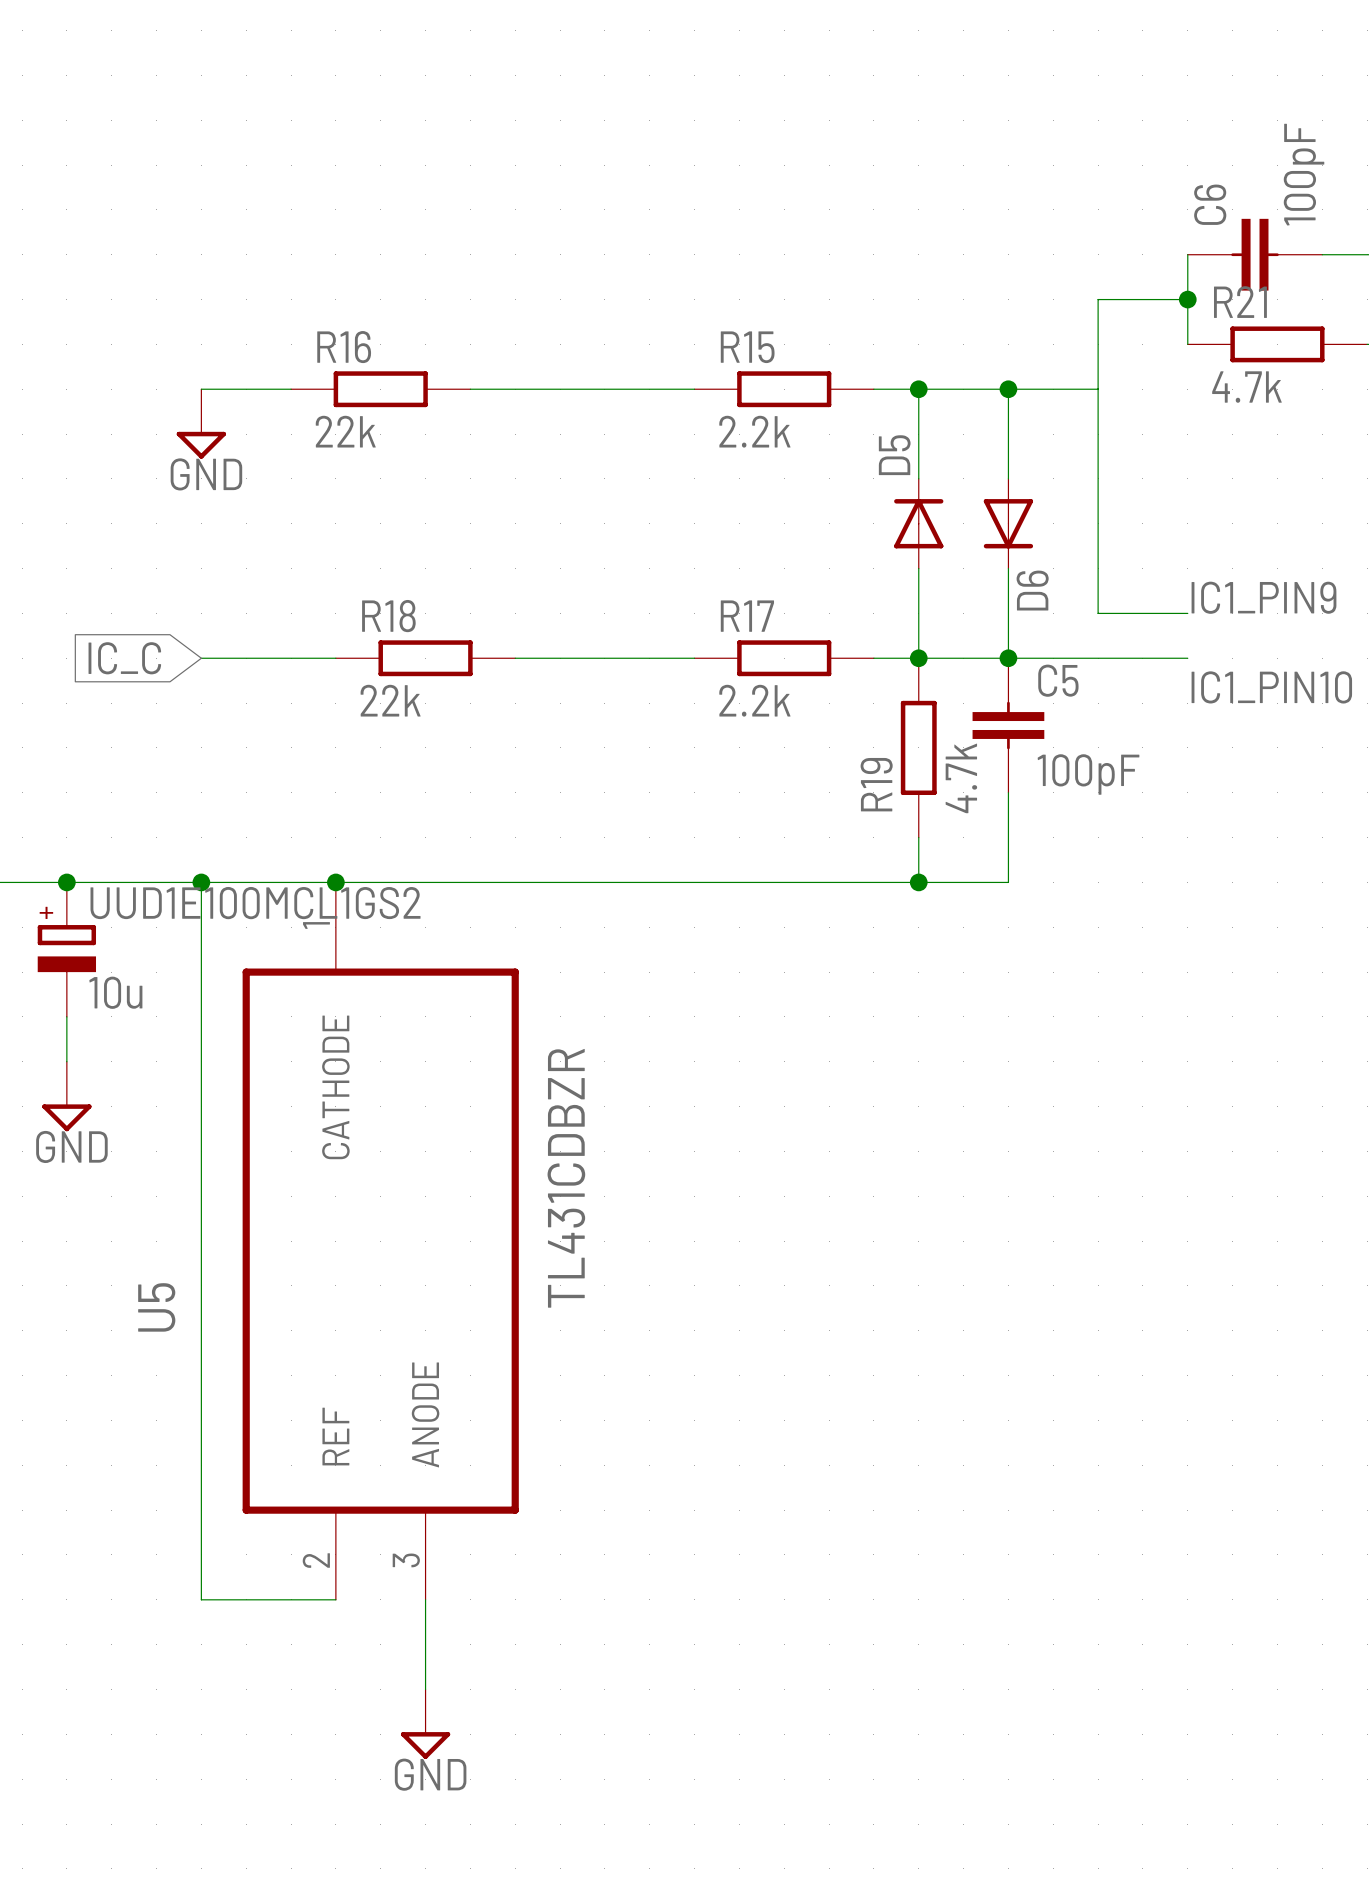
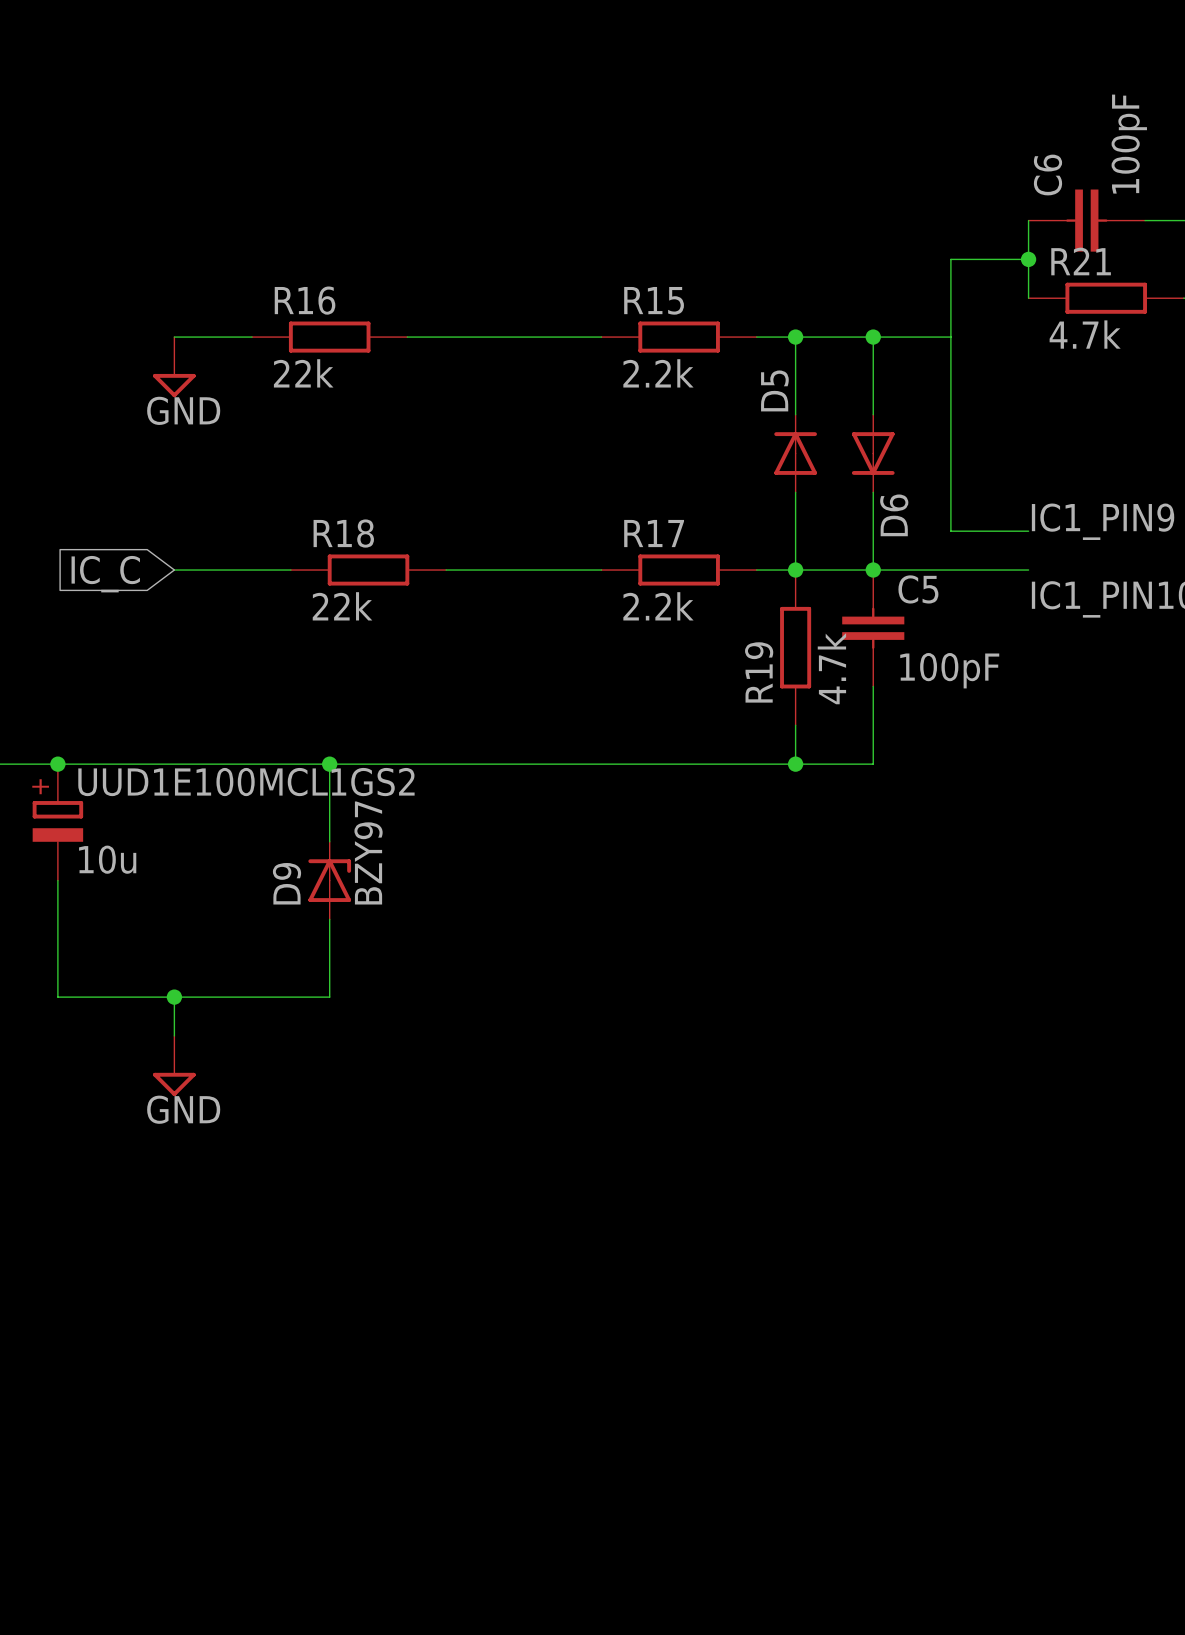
wire: (201, 882) (201, 1151) -> none
junction: (201, 882) -> none
junction position: (335, 882) -> (329, 764)
wire: none -> (329, 764) (329, 841)
D9: none -> BZY97 (329, 880)
wire: none -> (57, 919) (57, 997) (329, 997) (329, 919)
power symbol position: GND (66, 1096) -> GND (174, 1066)
junction: none -> (174, 997)
wire: (201, 1196) (201, 1599) (335, 1599) -> none
U5: TL431CDBZR (380, 1241) -> none
wire: (425, 1599) (425, 1689) -> none
power symbol: GND (425, 1724) -> none

